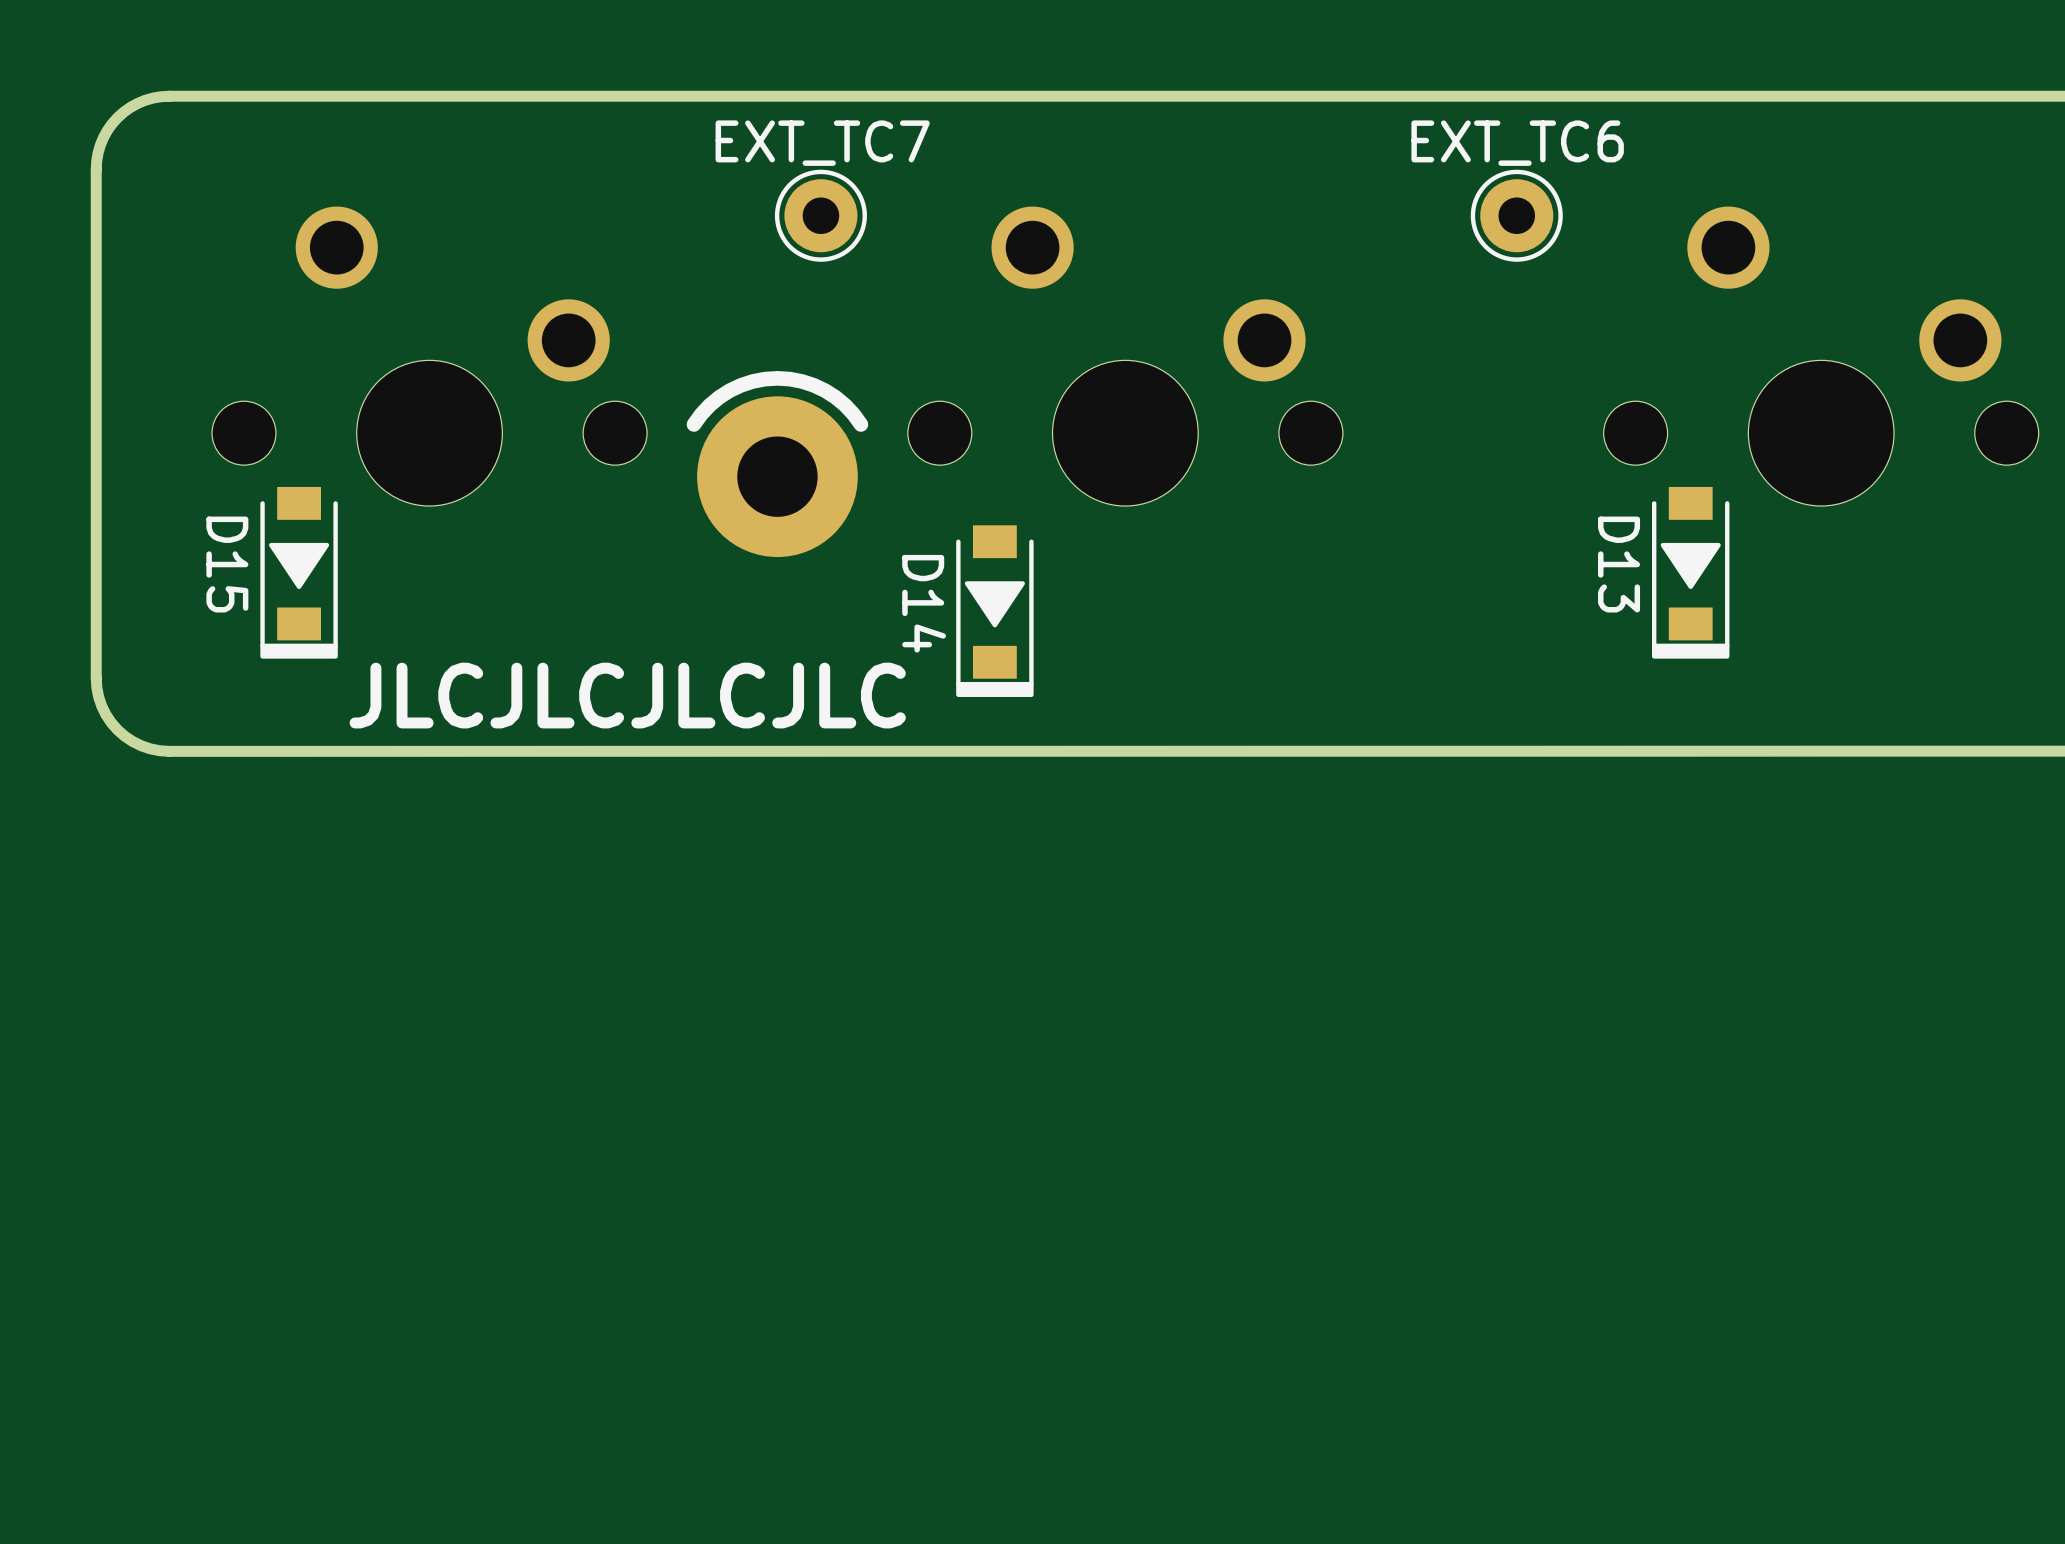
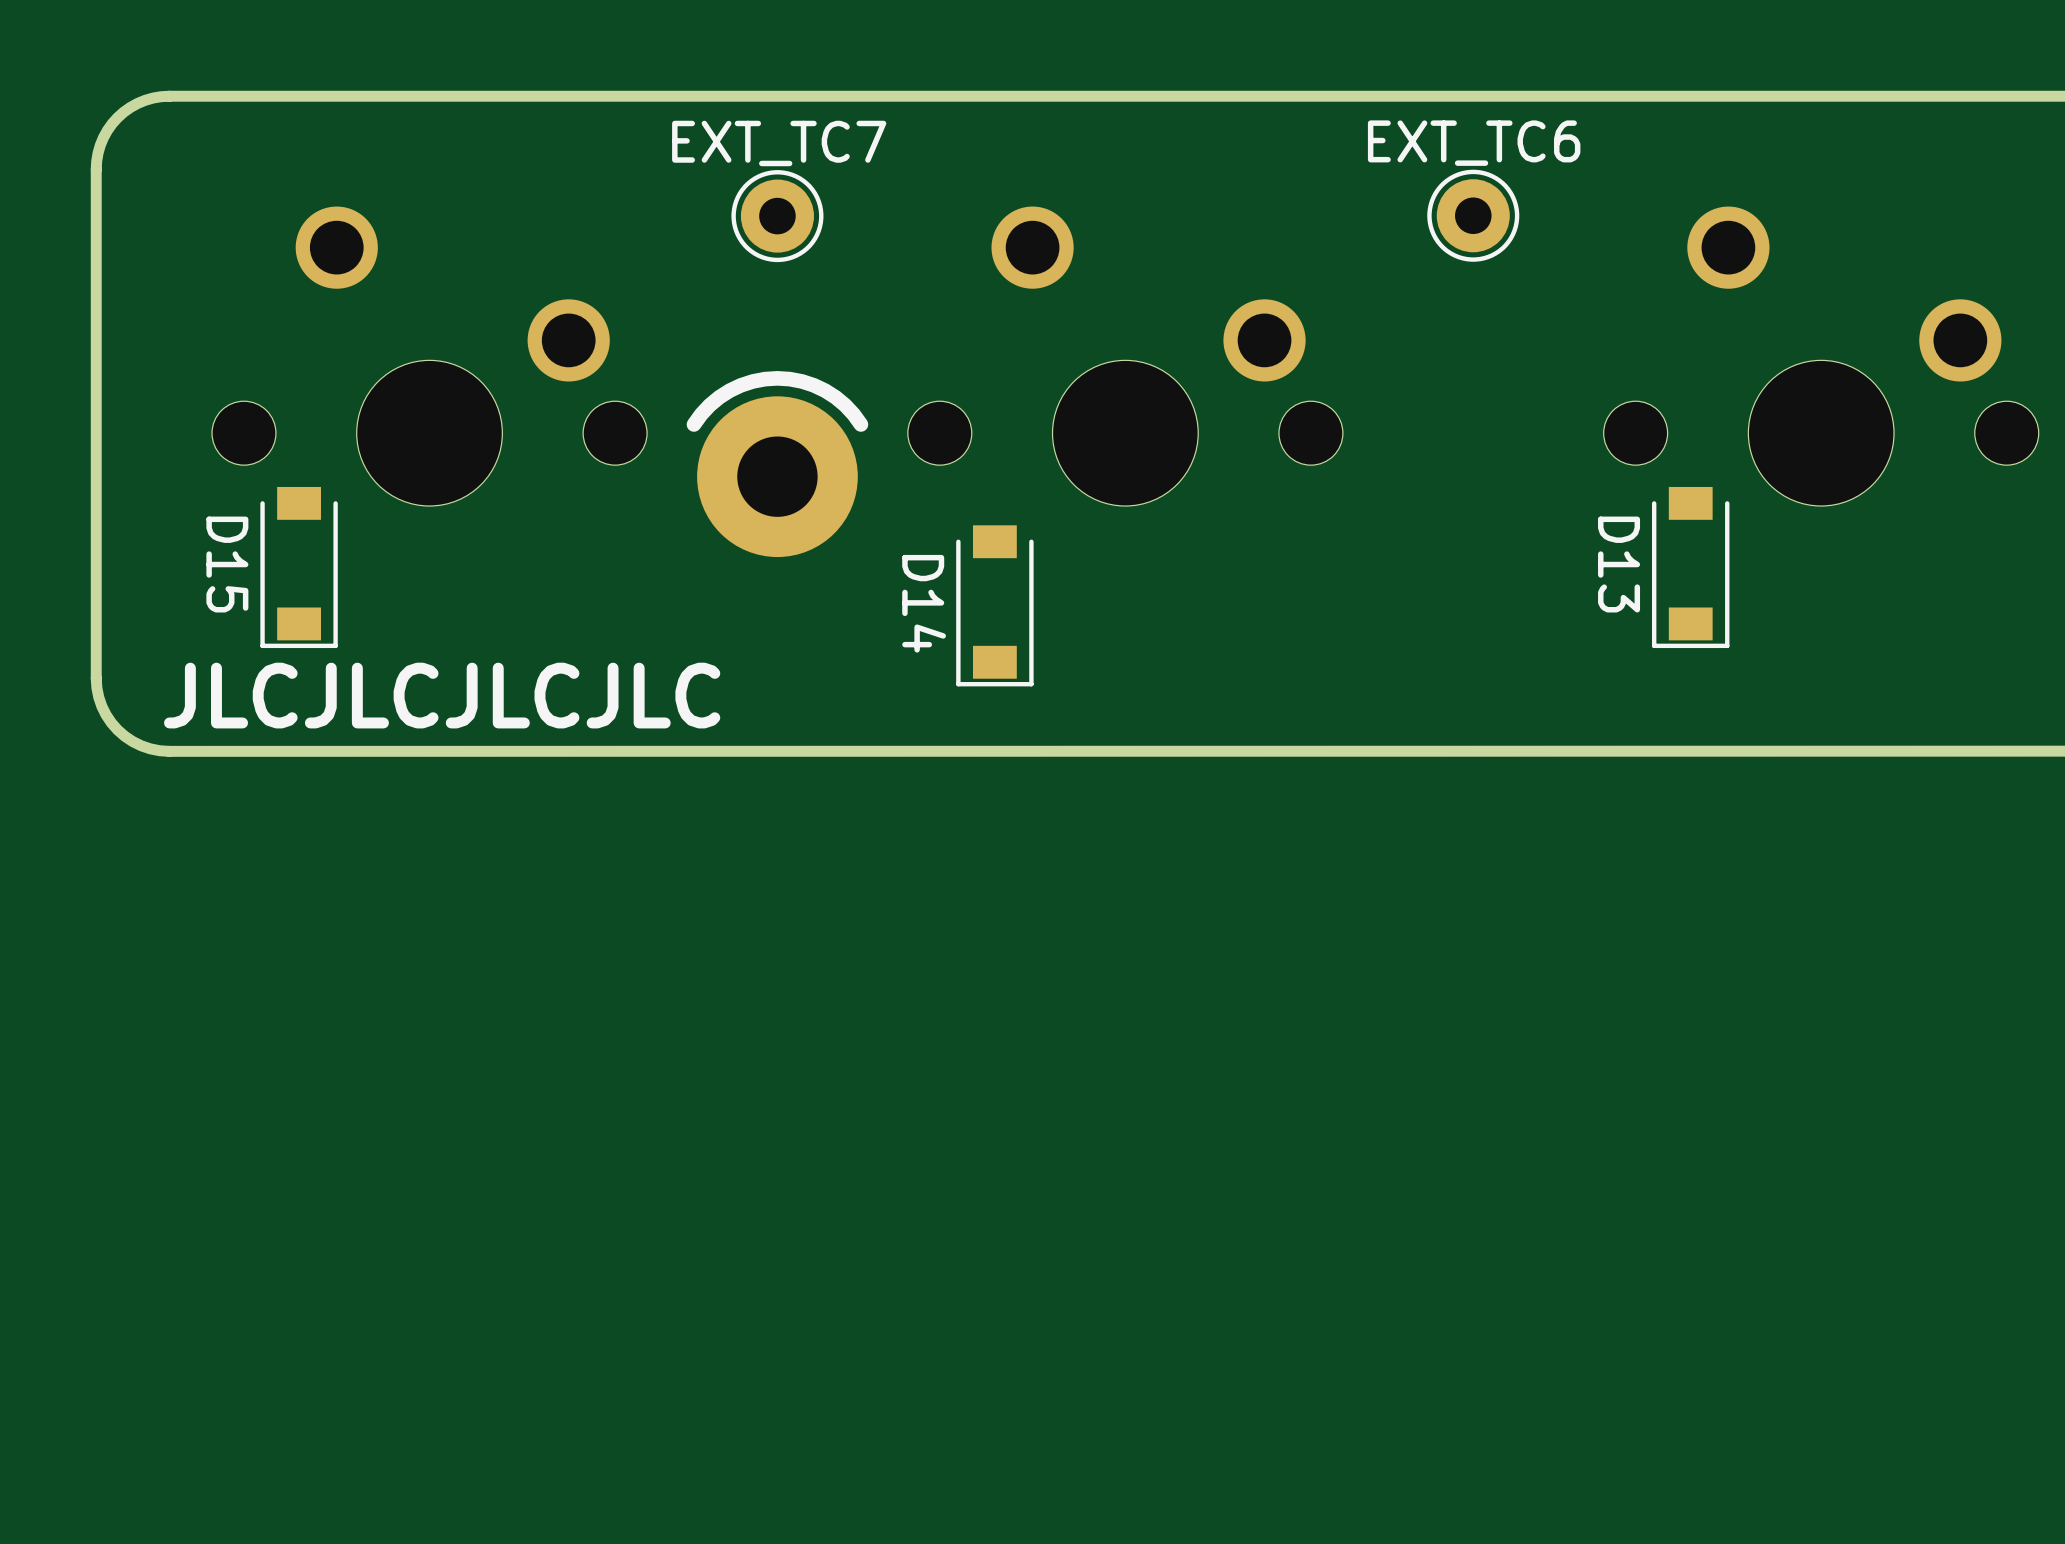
EXT_TC7 position: (820, 215) -> (777, 216)
EXT_TC6 position: (1516, 215) -> (1473, 215)
D15 footprint: [260, 486, 338, 659] -> [260, 486, 338, 649]
D13 footprint: [1652, 486, 1730, 659] -> [1652, 486, 1730, 649]
D14 footprint: [956, 525, 1034, 697] -> [956, 525, 1034, 687]
text position: JLCJLCJLCJLC (627, 695) -> JLCJLCJLCJLC (442, 695)

